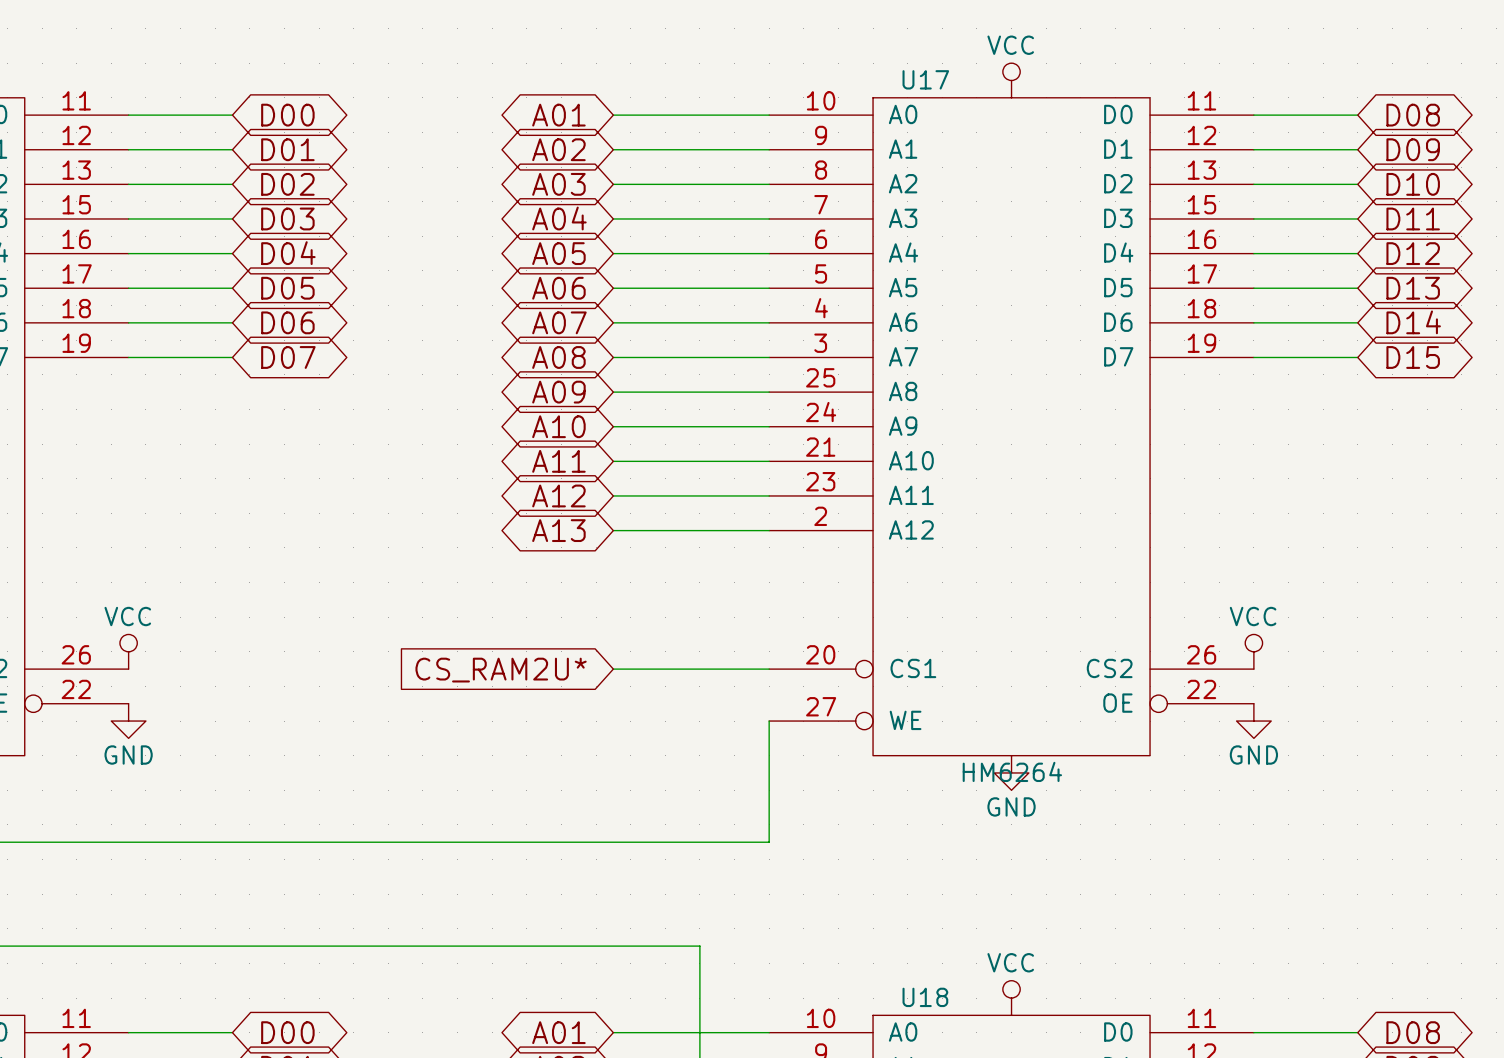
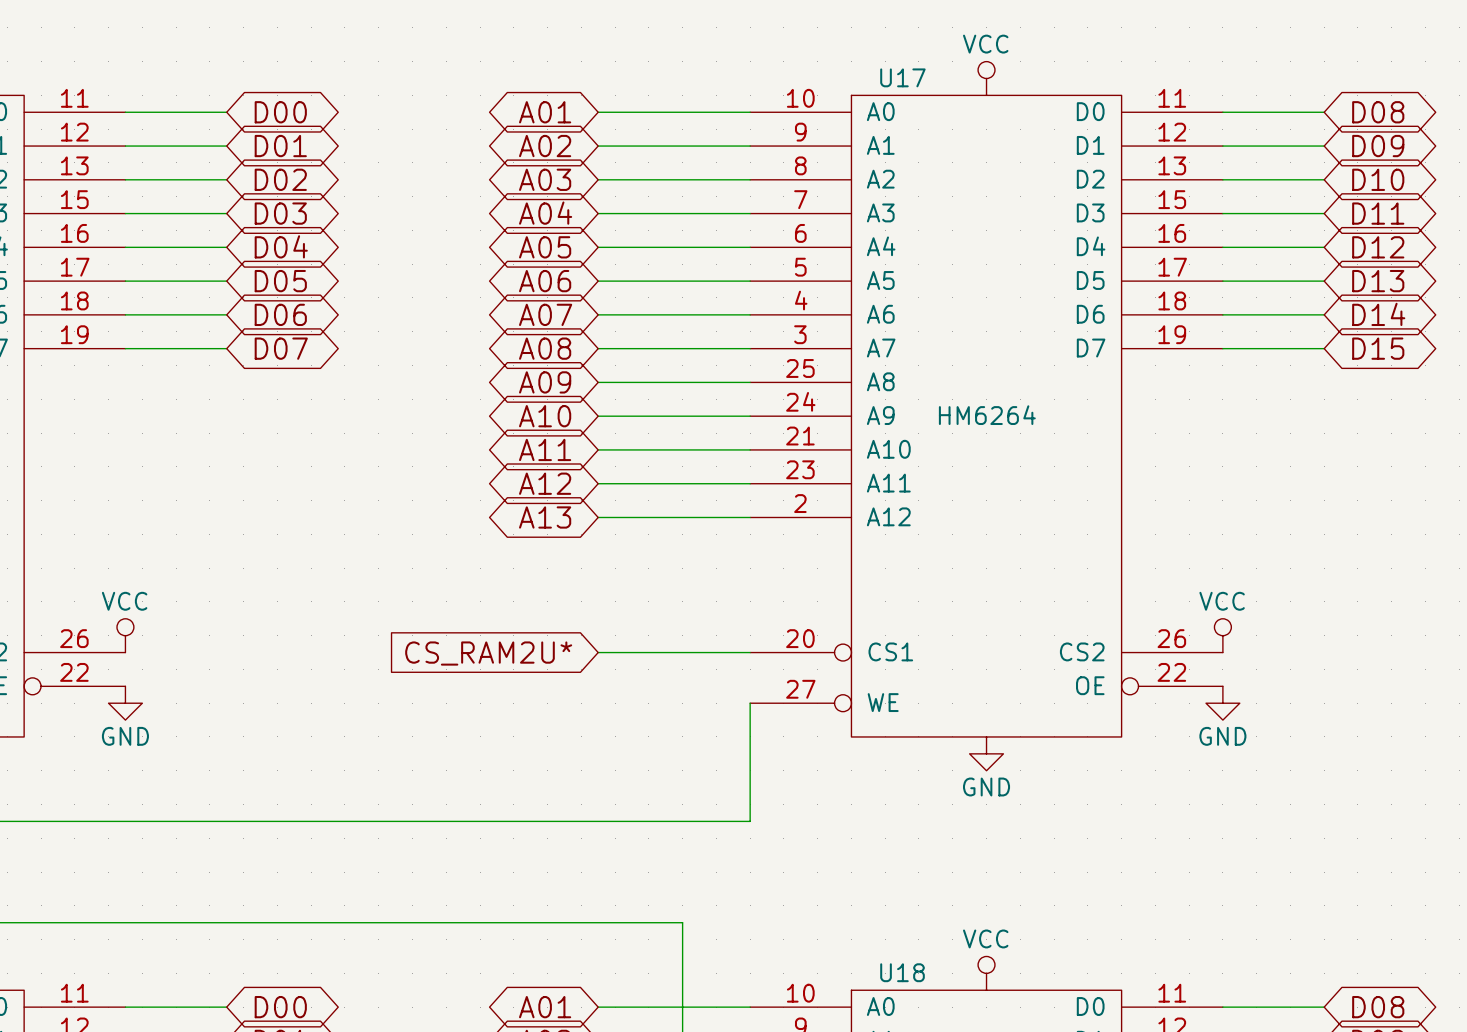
U17 value position: HM6264 (1012, 771) -> HM6264 (987, 415)

